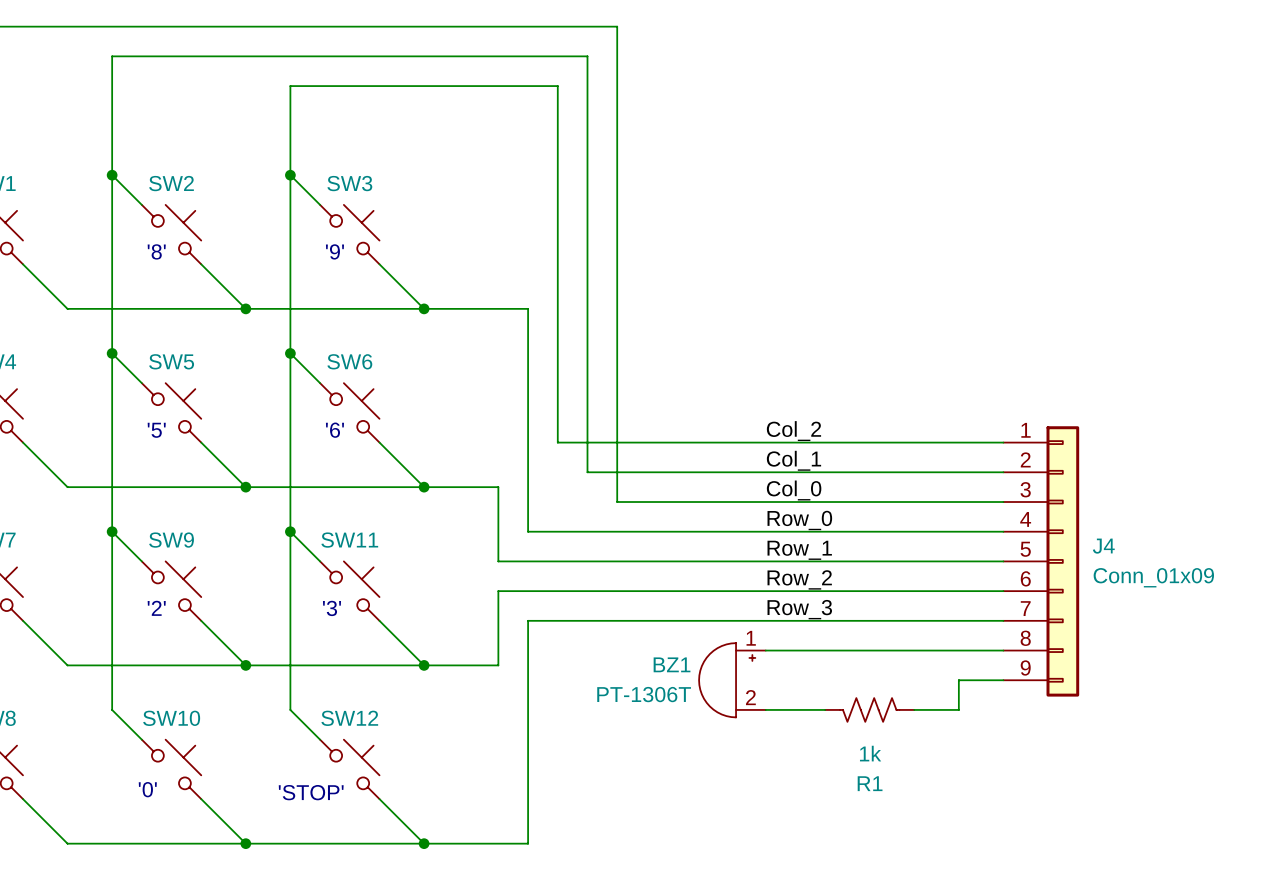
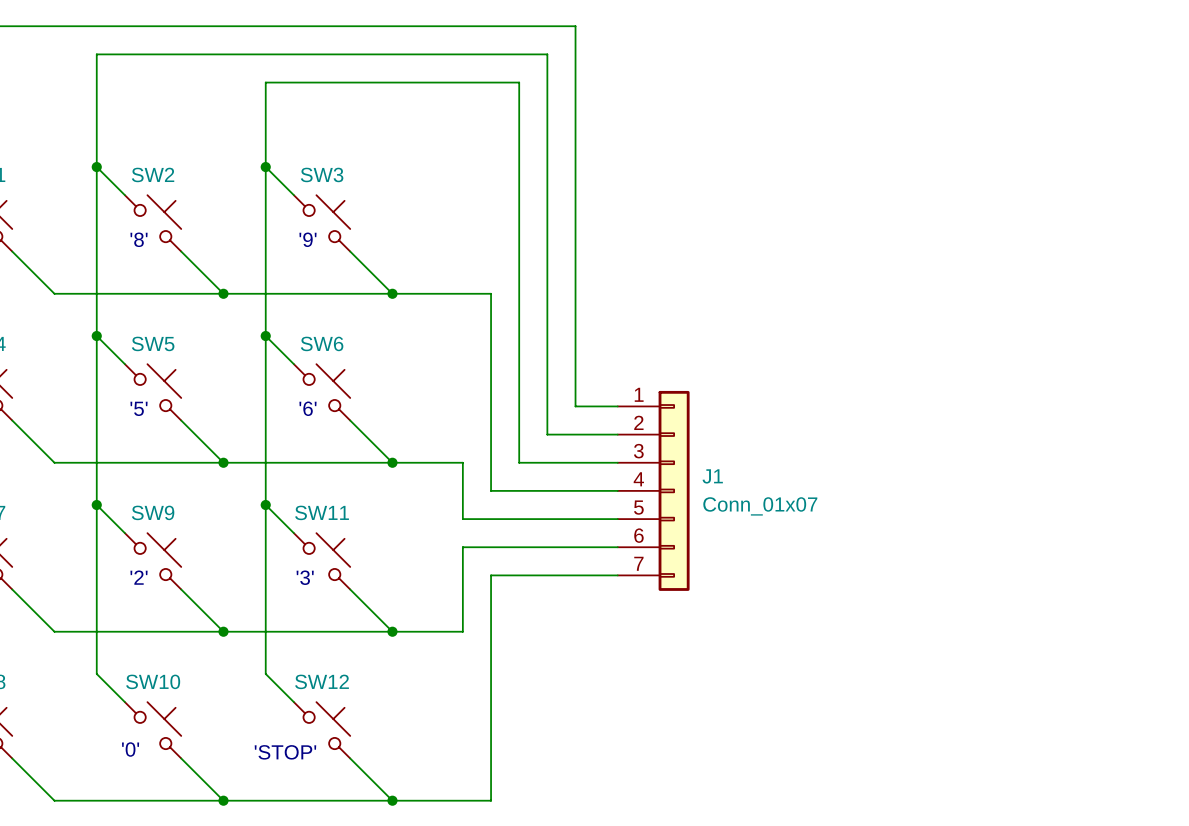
wire: (617, 427) (617, 502) (1003, 502) -> (575, 406) (617, 406)
label: Col_2 (793, 431) -> none
wire: (557, 442) (1003, 442) -> (519, 420) (519, 462) (617, 462)
wire: (587, 457) (587, 472) (1003, 472) -> (547, 434) (617, 434)
label: Col_1 (793, 460) -> none
label: Col_0 (794, 490) -> none
wire: (528, 516) (528, 531) (1003, 531) -> (491, 490) (617, 490)
J1: none -> Conn_01x07 (653, 490)
label: Row_0 (799, 520) -> none
wire: (498, 546) (498, 561) (1003, 561) -> (462, 519) (617, 519)
label: Row_1 (799, 550) -> none
J4: Conn_01x09 (1041, 561) -> none
label: Row_2 (799, 579) -> none
wire: (498, 591) (1003, 591) -> (462, 561) (462, 547) (617, 547)
label: Row_3 (799, 609) -> none
wire: (528, 620) (1003, 620) -> (491, 589) (491, 575) (617, 575)
wire: (765, 650) (1003, 650) -> none
BZ1: PT-1306T (732, 680) -> none
wire: (1003, 680) (958, 680) (958, 709) (914, 709) -> none
wire: (765, 709) (825, 709) -> none
R1: 1k (869, 709) -> none

